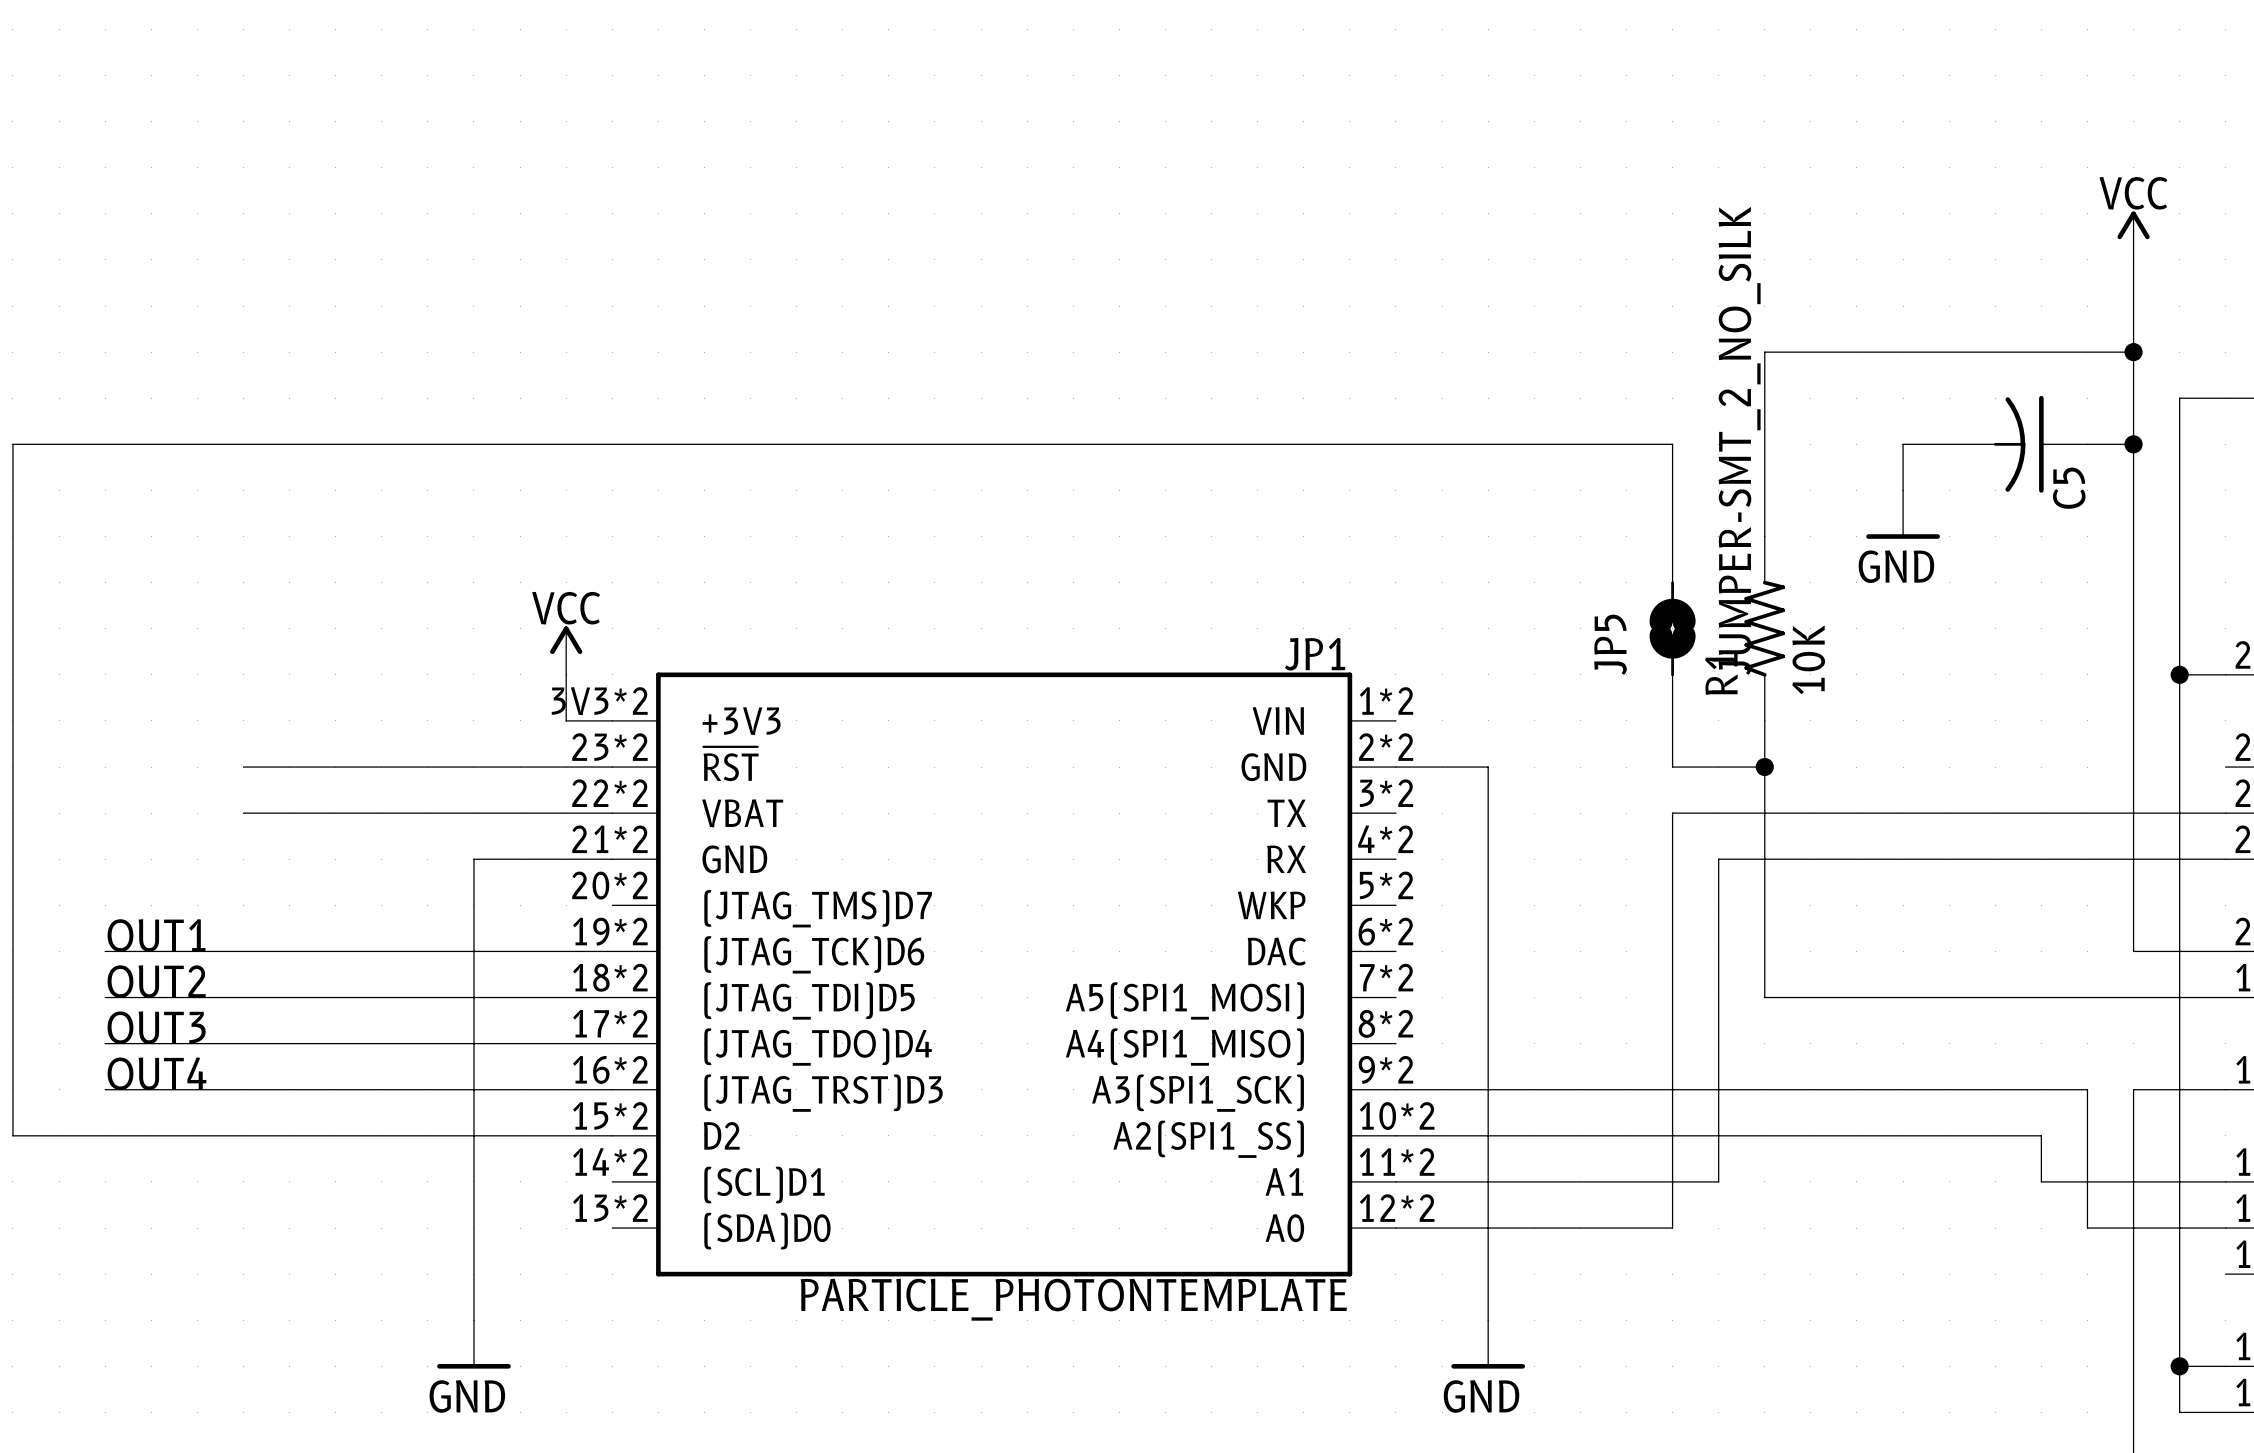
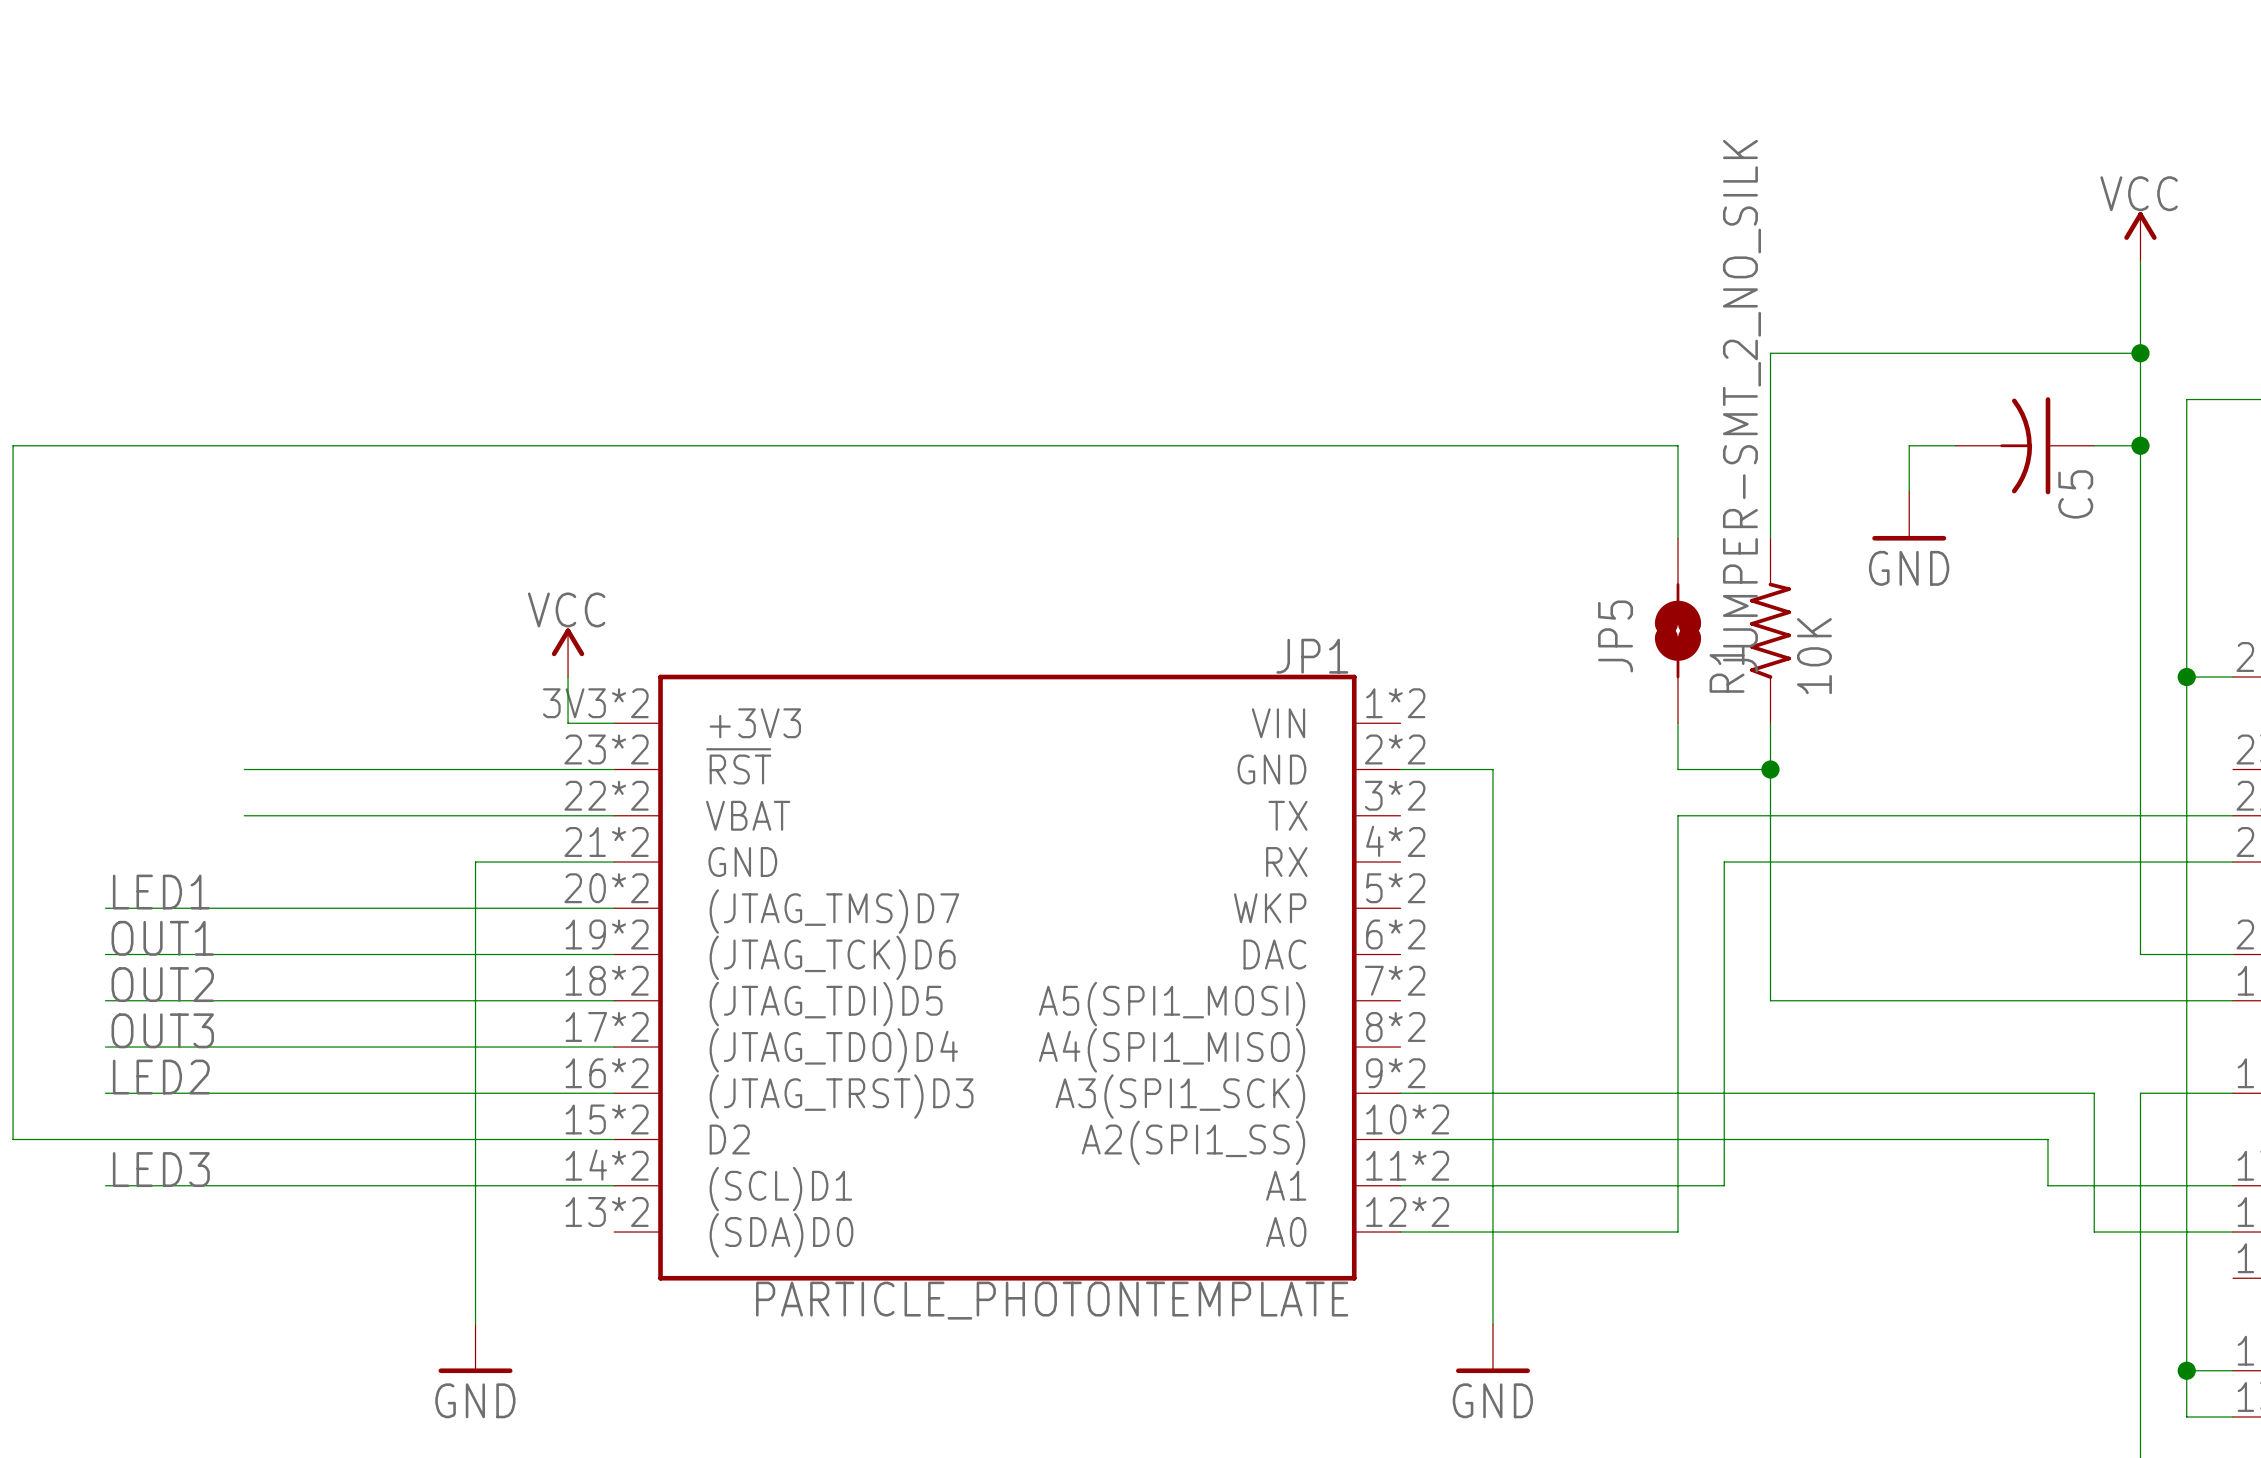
label: none -> LED1 (161, 892)
wire: none -> (105, 908) (614, 908)
label: OUT4 (157, 1073) -> LED2 (161, 1077)
label: none -> LED3 (161, 1169)
wire: none -> (105, 1185) (614, 1185)

